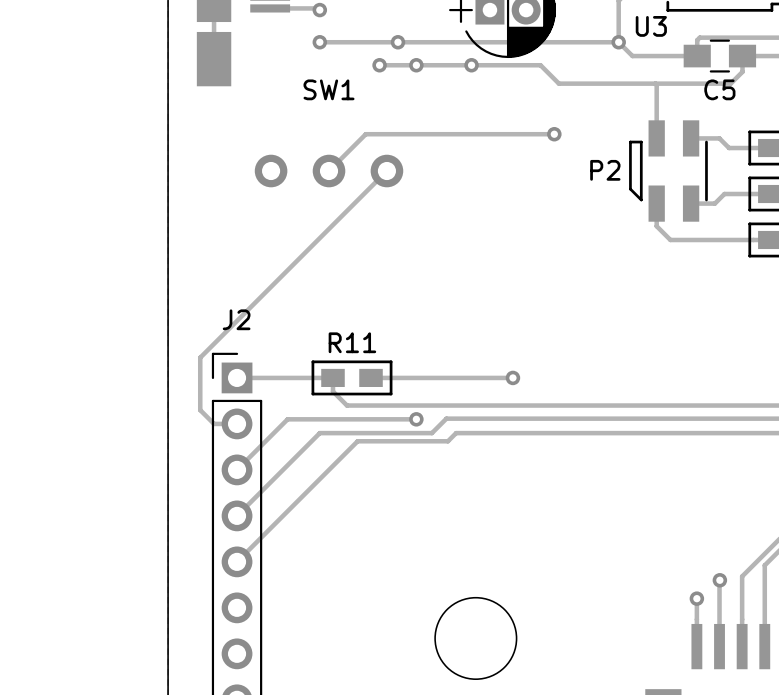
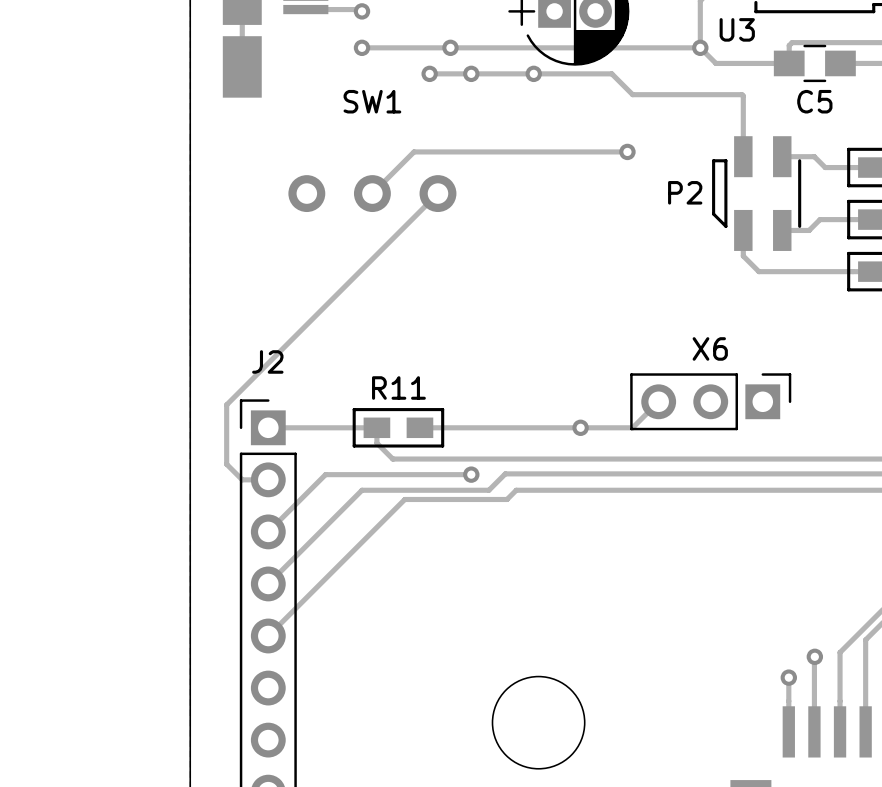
track: (742, 56) (742, 71) (730, 83) (655, 83) -> none
track: none -> (658, 401) (632, 427) (580, 427)
X6: none -> (710, 401)

